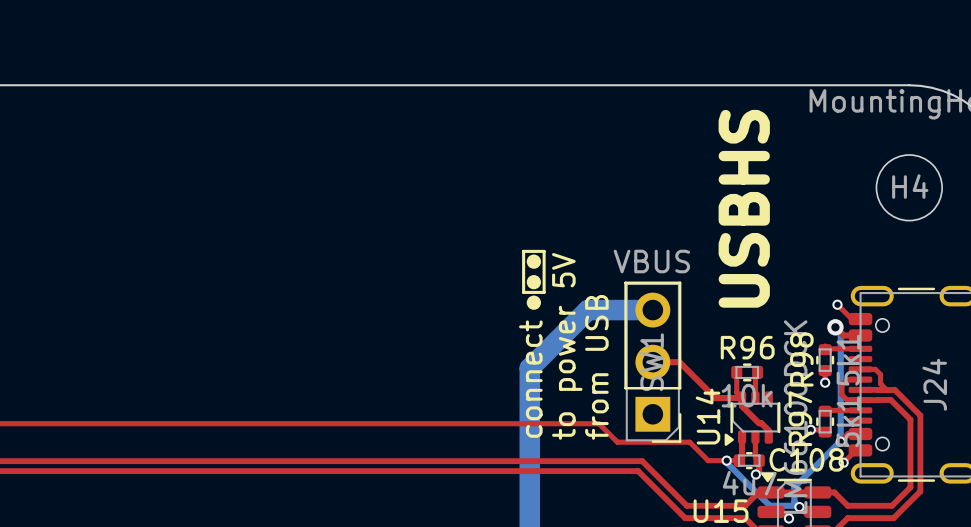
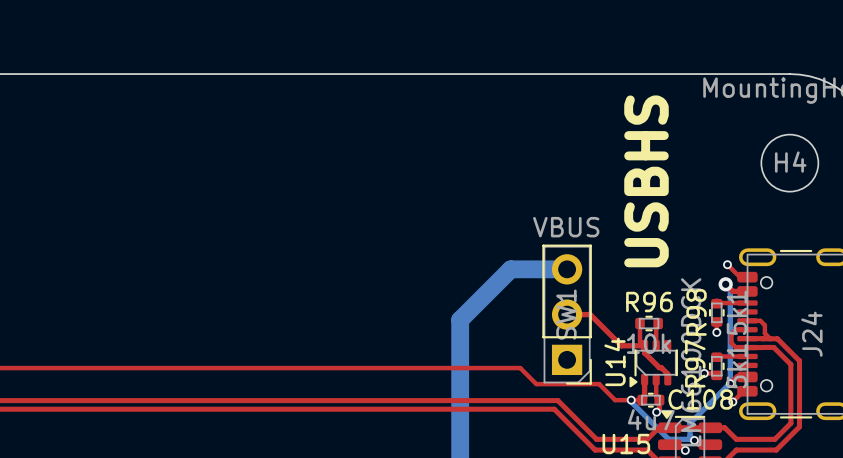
line: (523, 251) (544, 251) (544, 292) (523, 292) (523, 251) -> none
drawing: [526, 254, 541, 310] -> none
text: to power 5V (567, 346) -> none
text: from USB (596, 367) -> none
text: connect (530, 379) -> none

